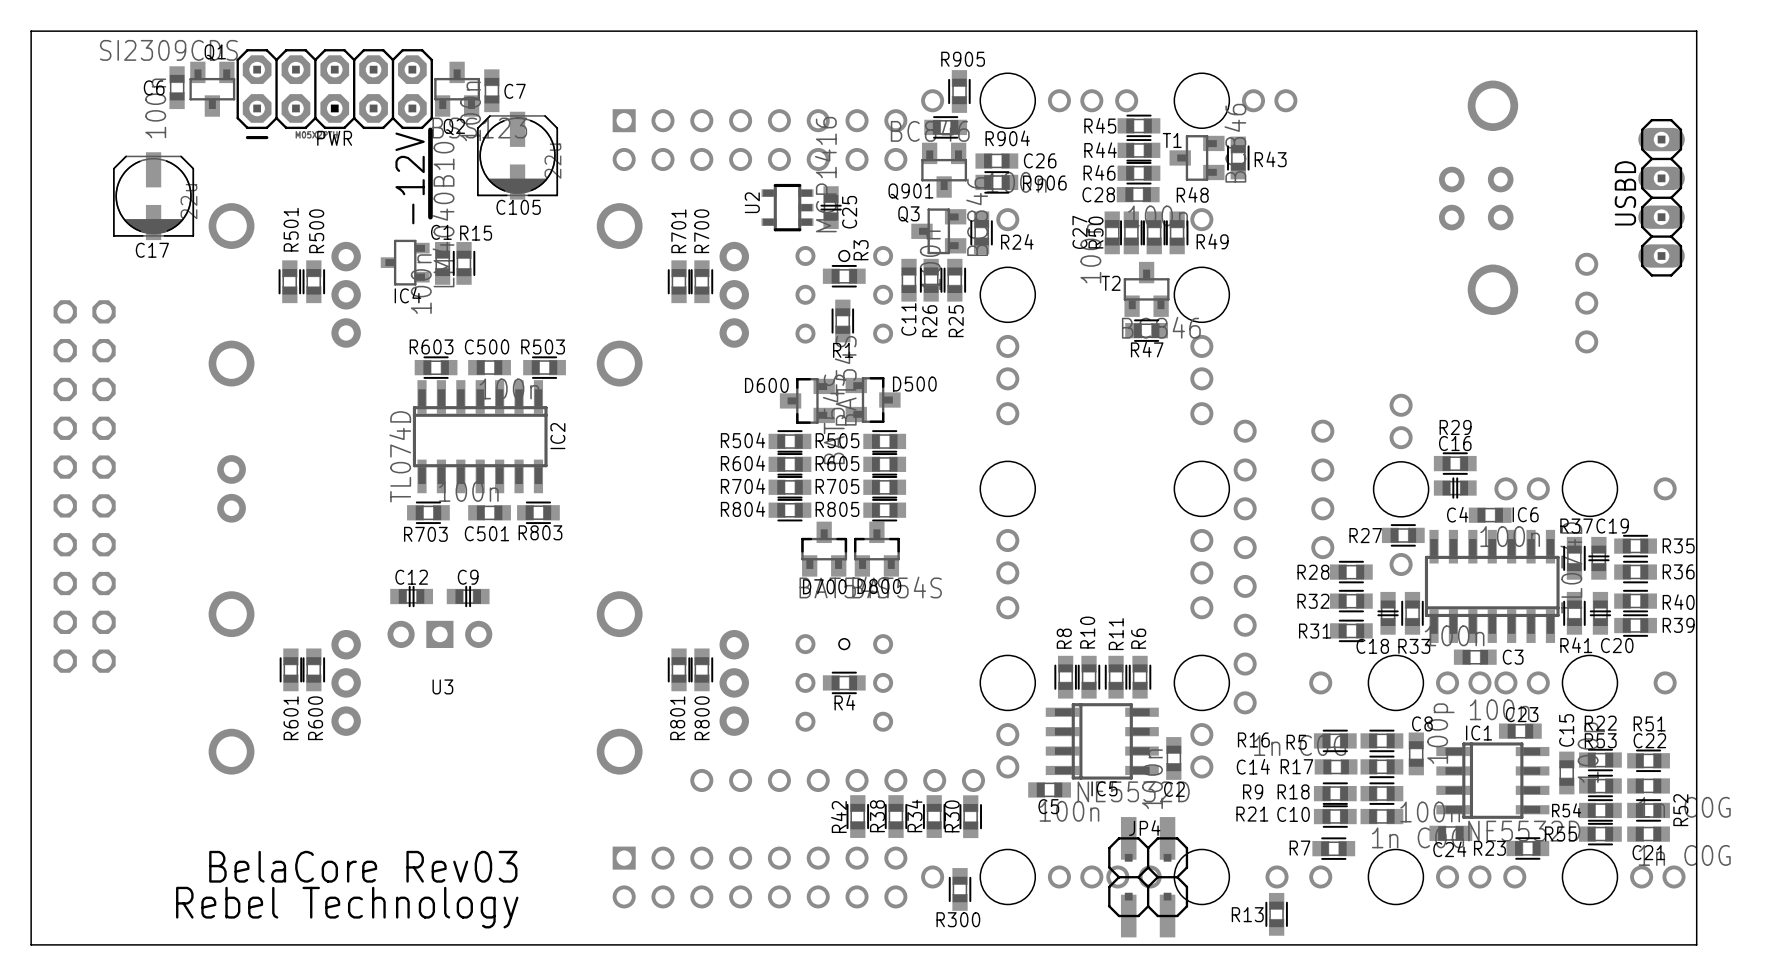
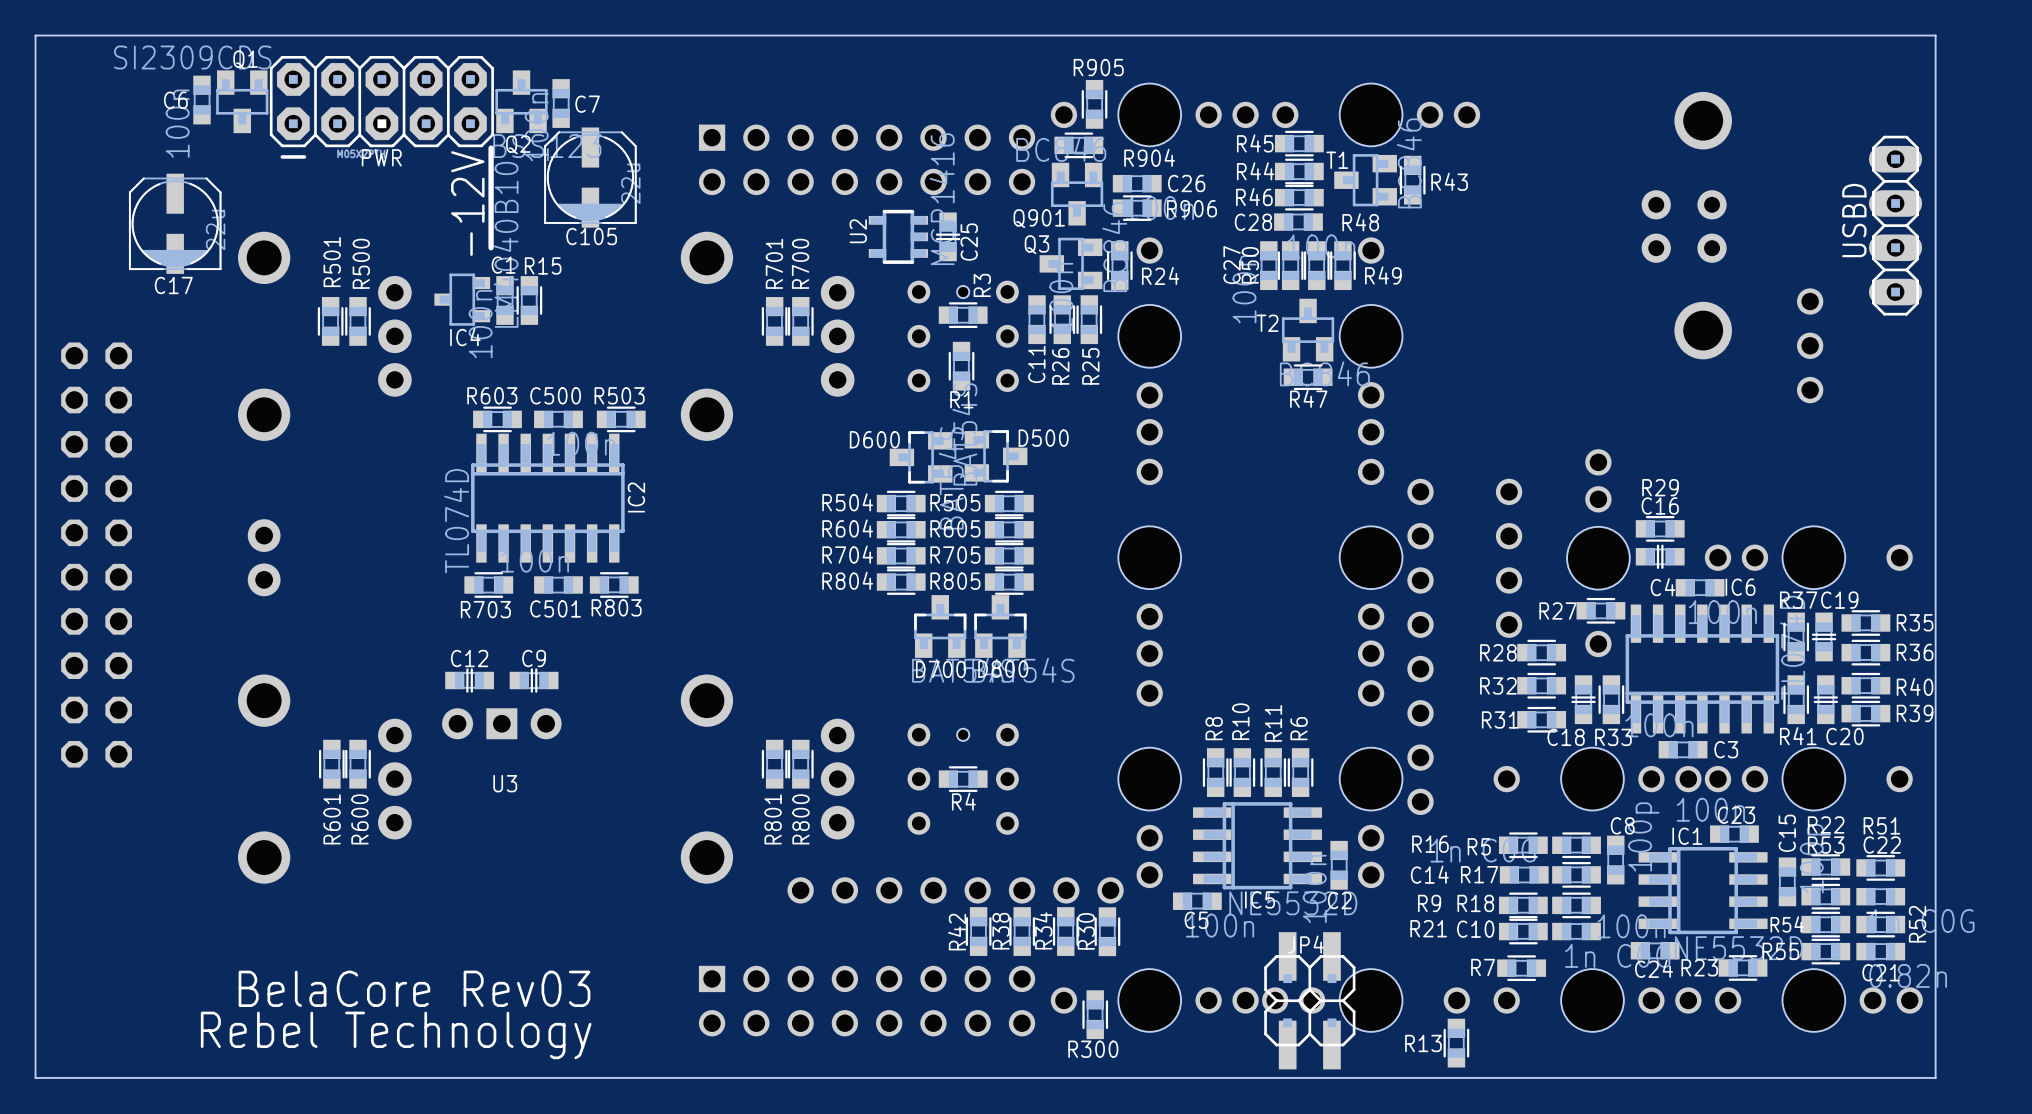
C21 value: 1n C0G (1684, 855) -> 0.82n (1908, 975)

